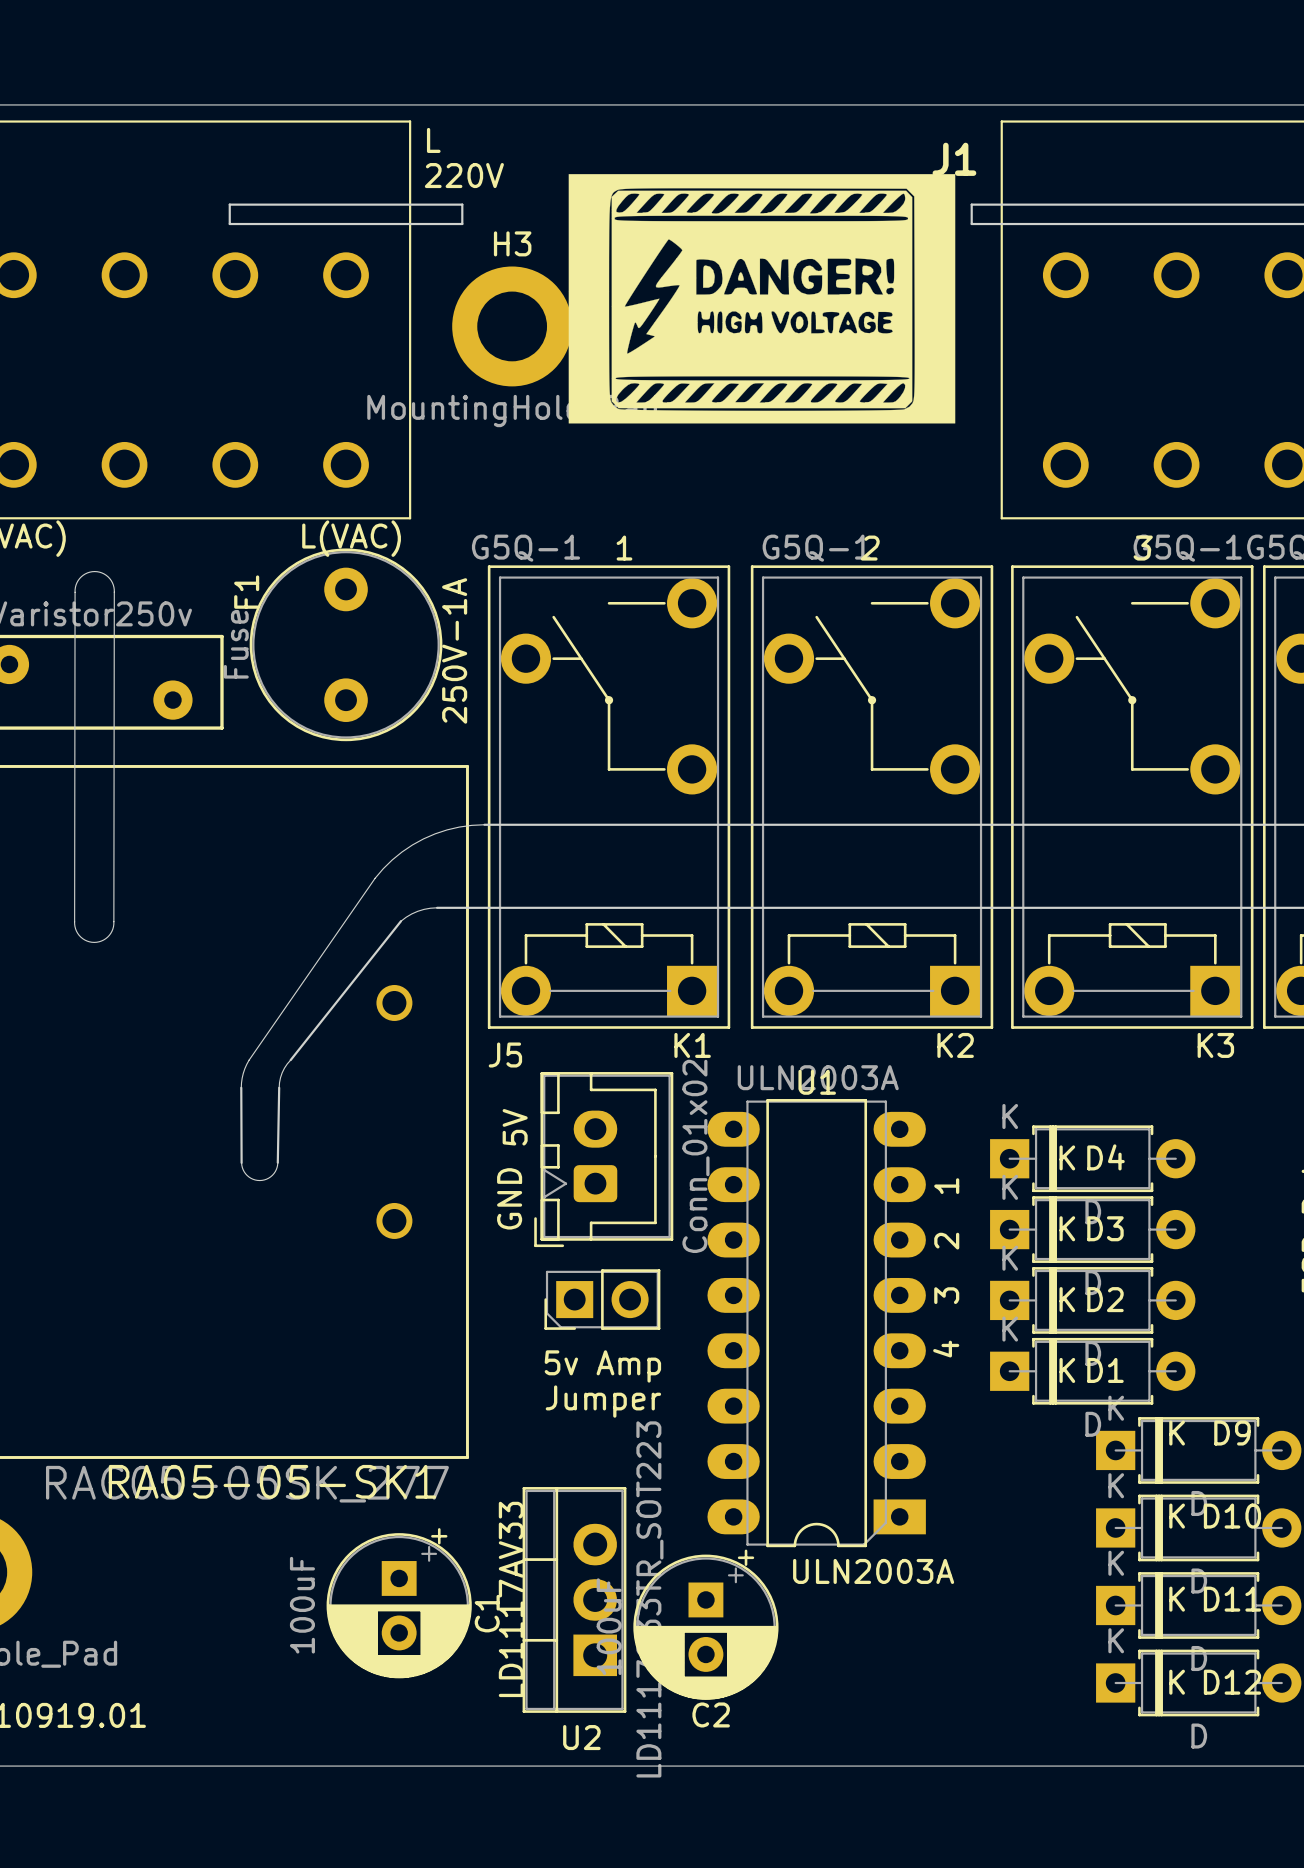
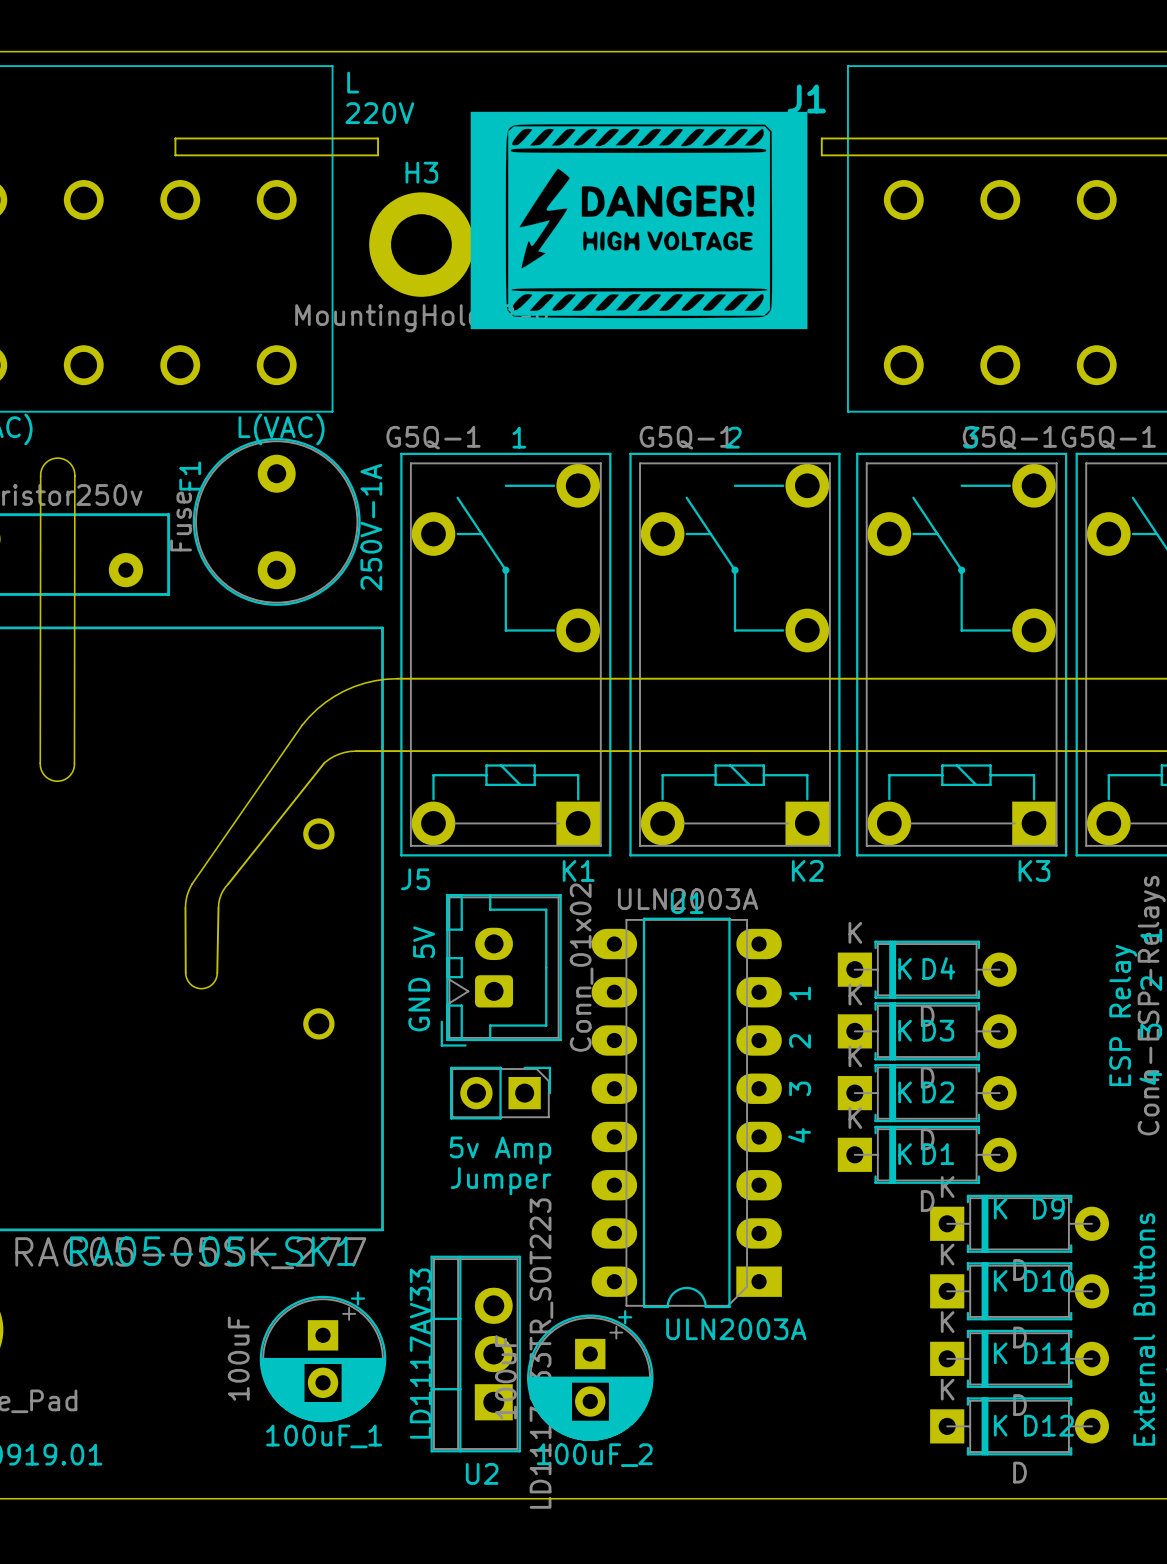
part rotation: 0° (602, 1299) -> 180° (500, 1093)
C1 name: C1 (487, 1613) -> 100uF_1 (324, 1436)
C2 name: C2 (711, 1714) -> 100uF_2 (594, 1455)

